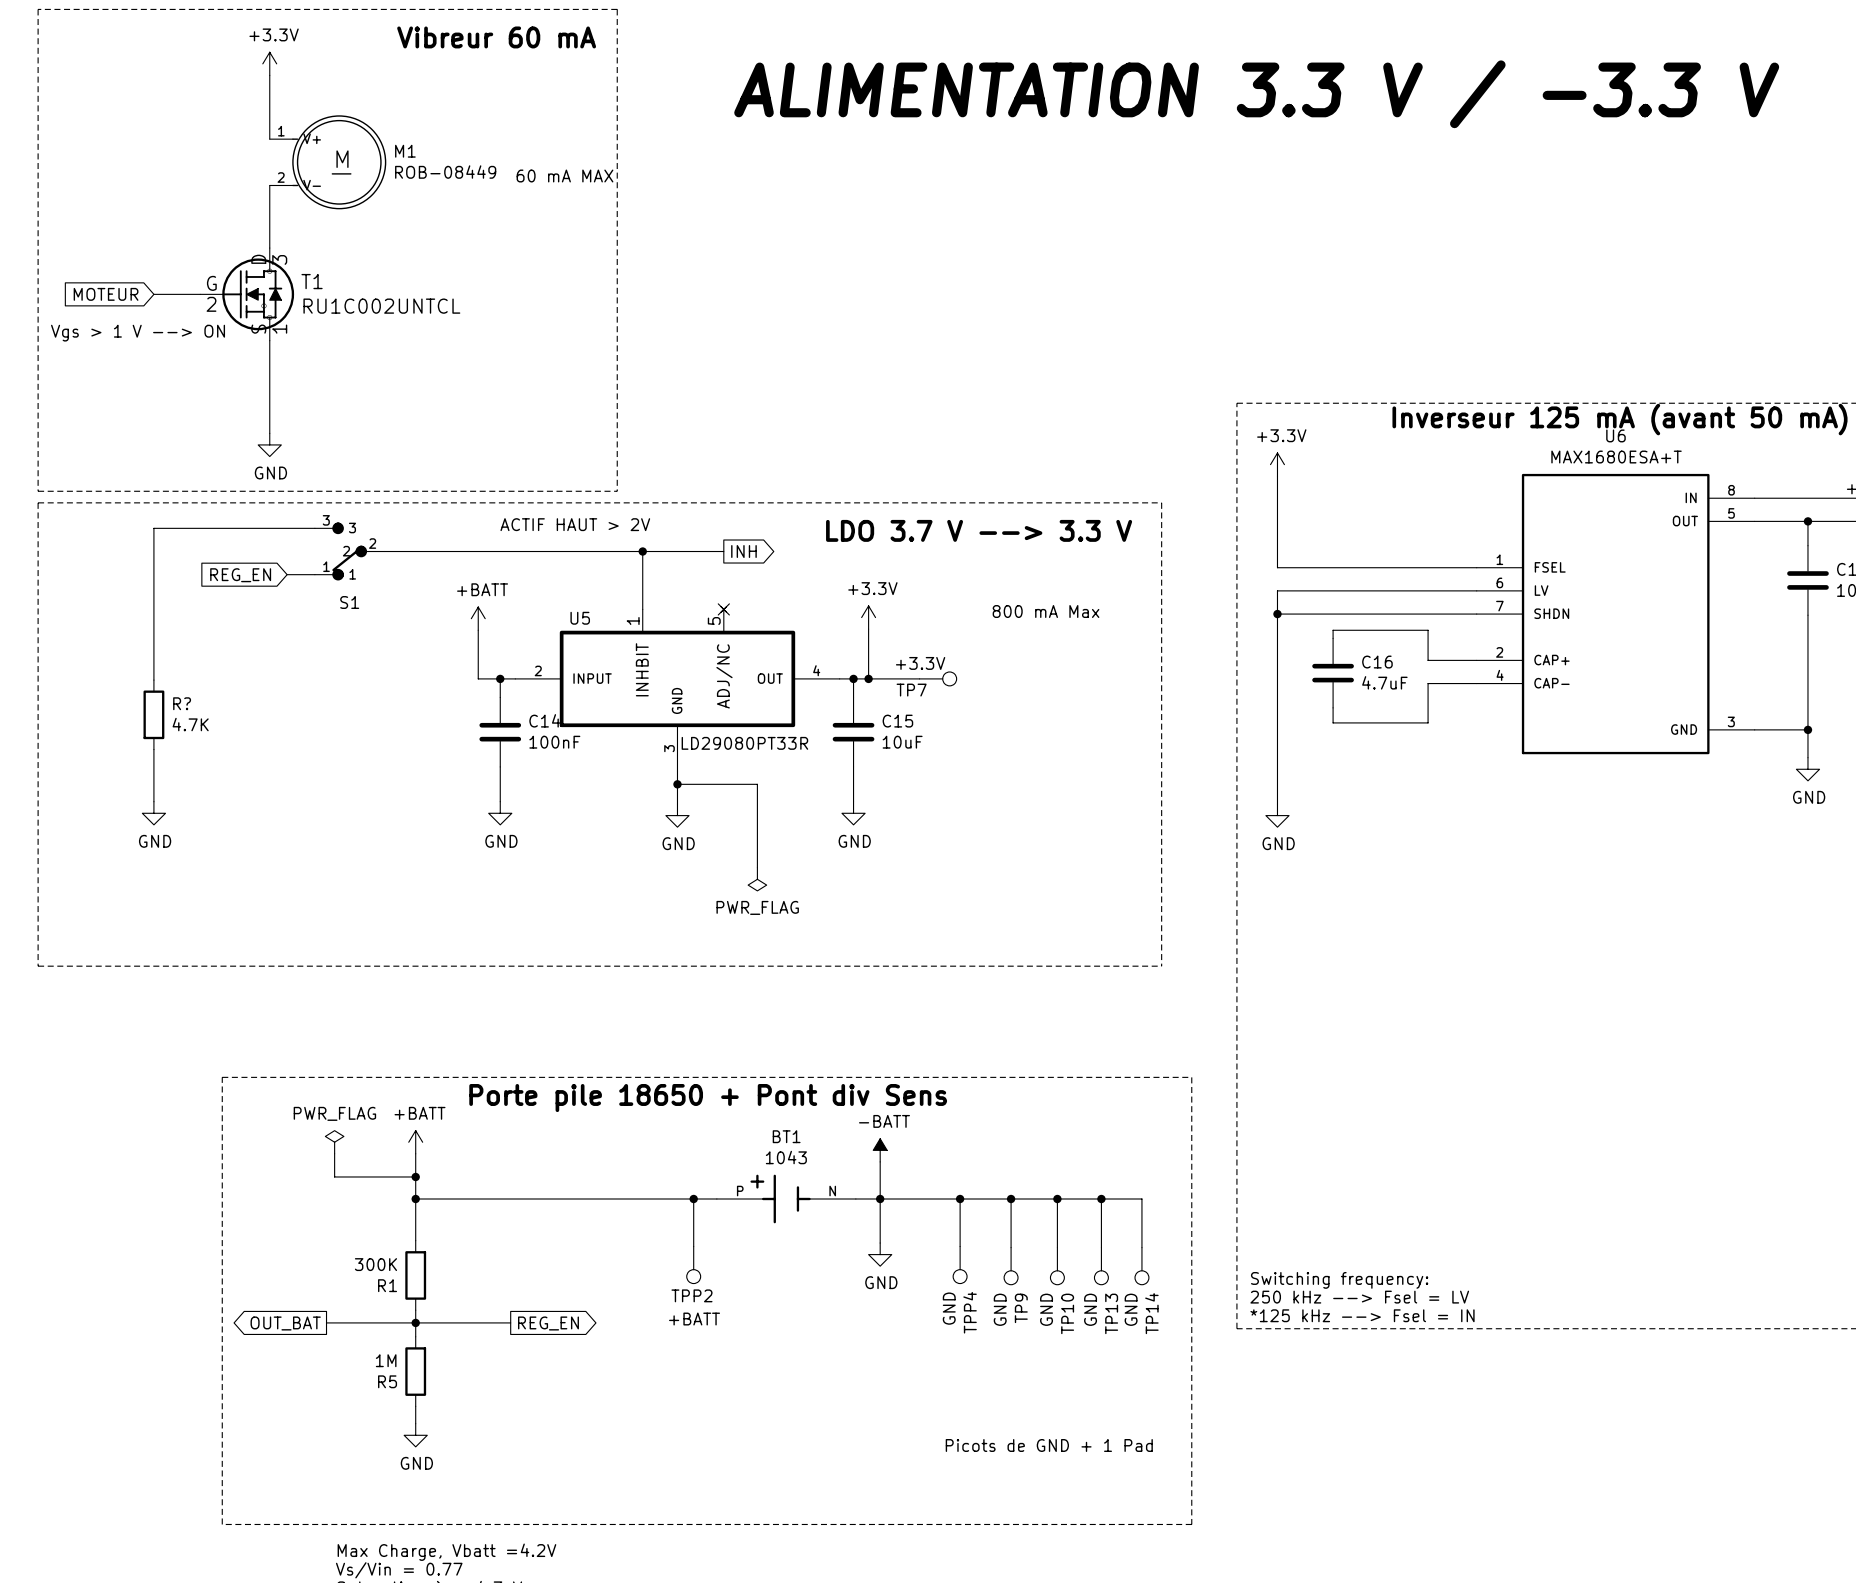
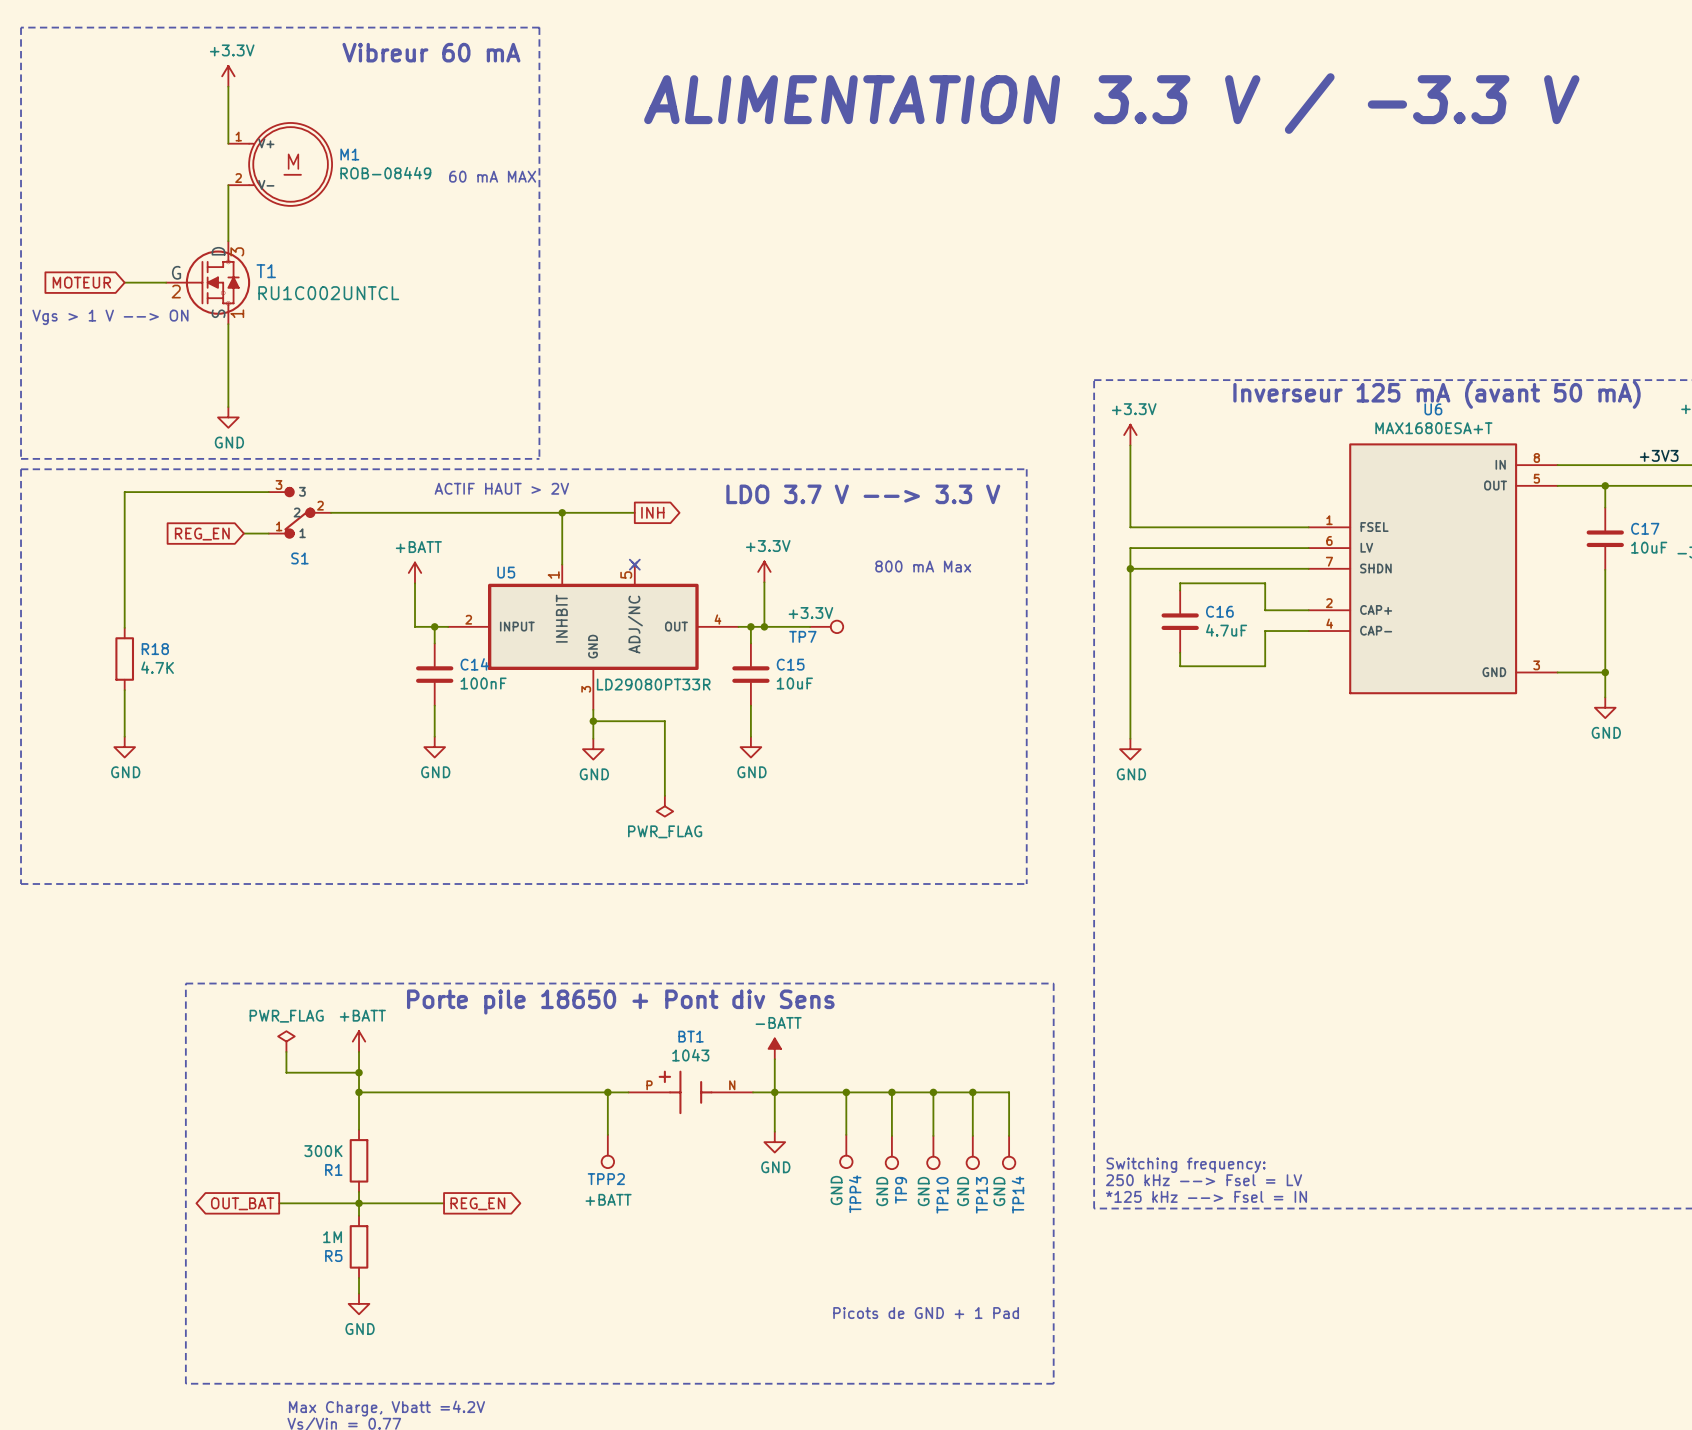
R? name: R? (182, 703) -> R18 (155, 649)

